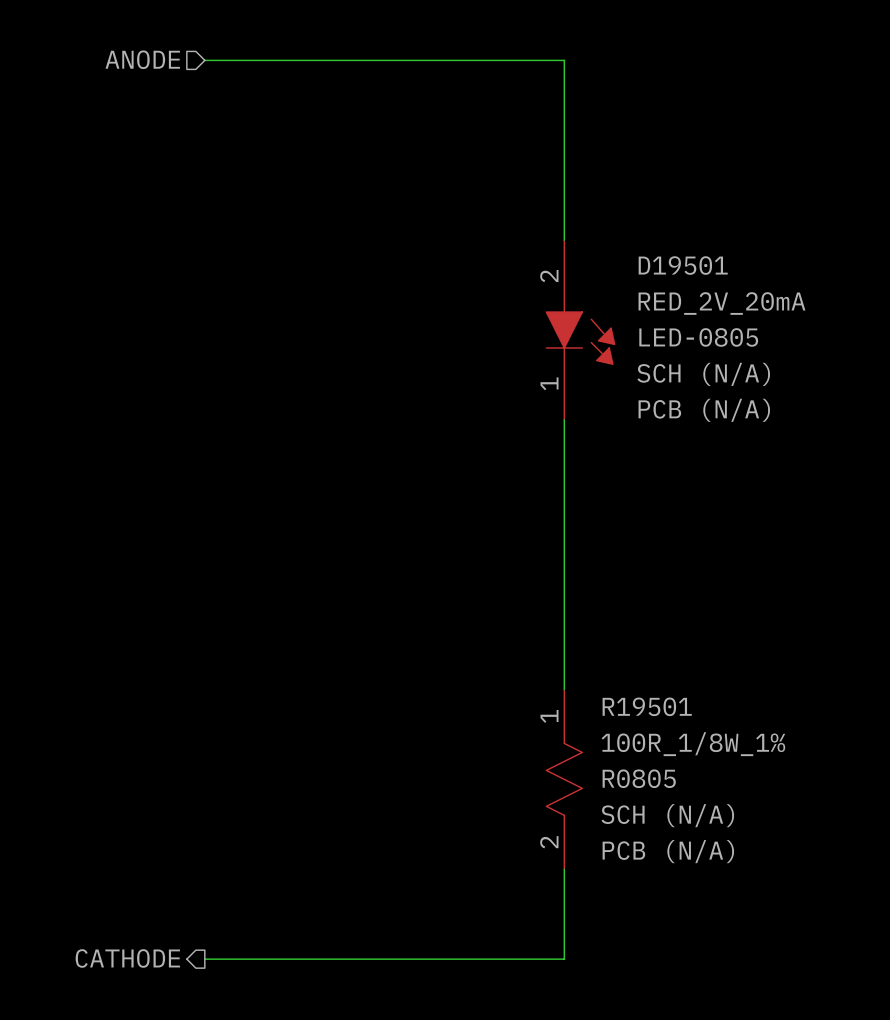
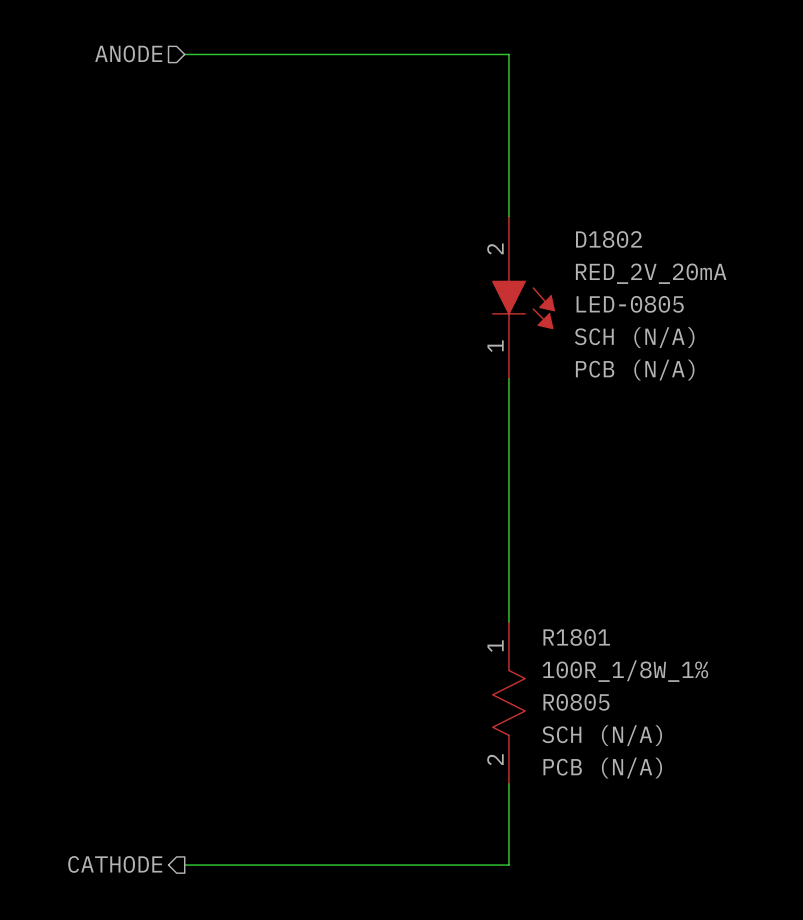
D19501 name: D19501 (683, 265) -> D1802 (609, 239)
R19501 name: R19501 (647, 706) -> R1801 (576, 637)

